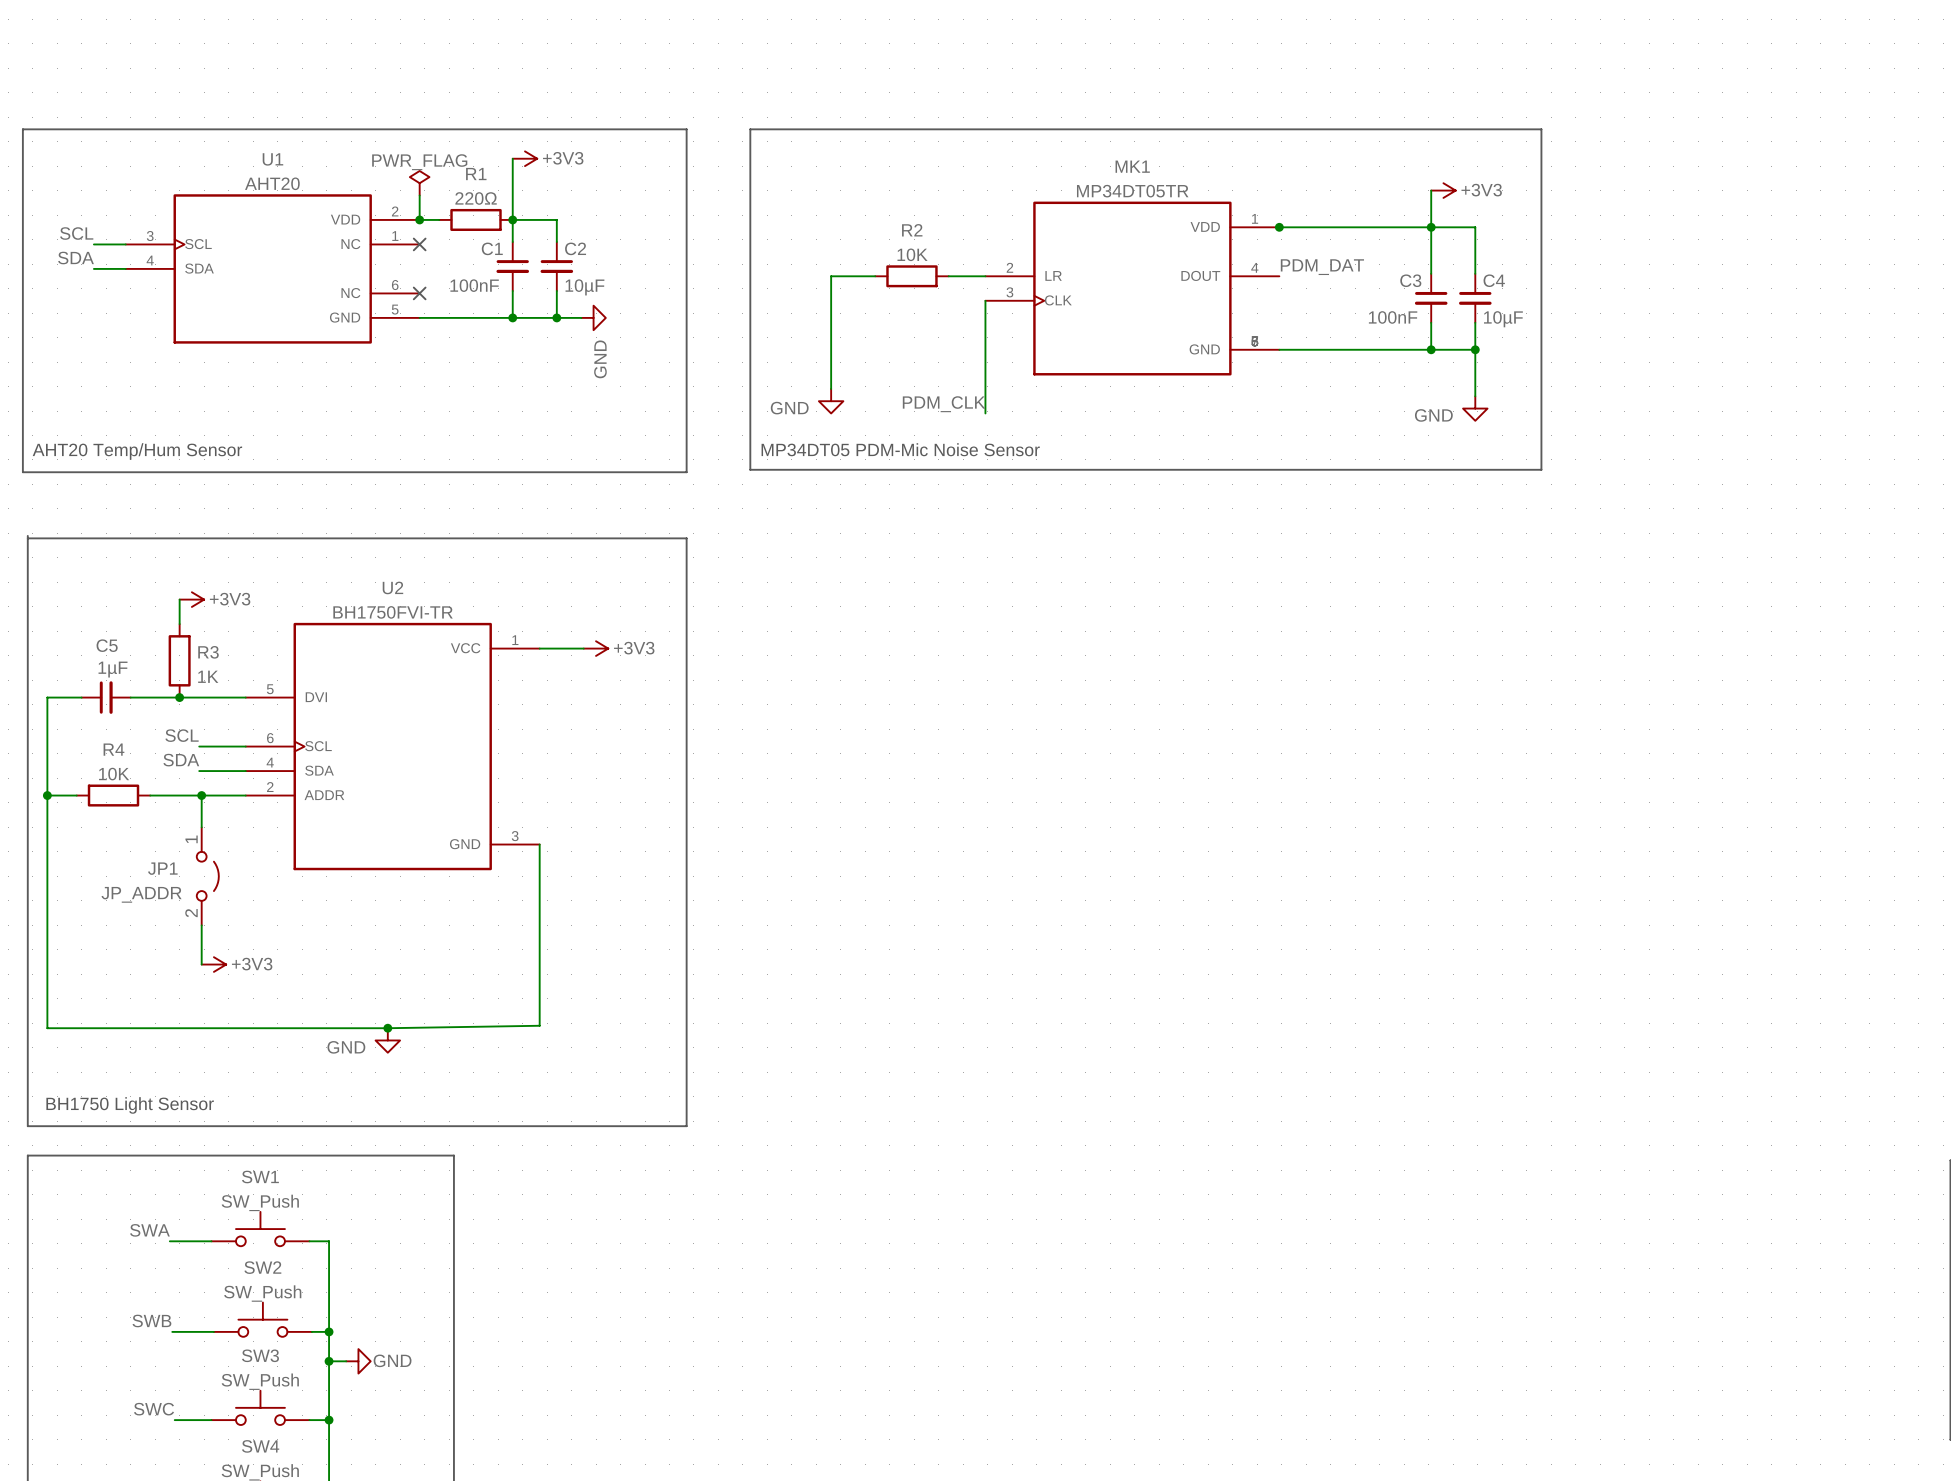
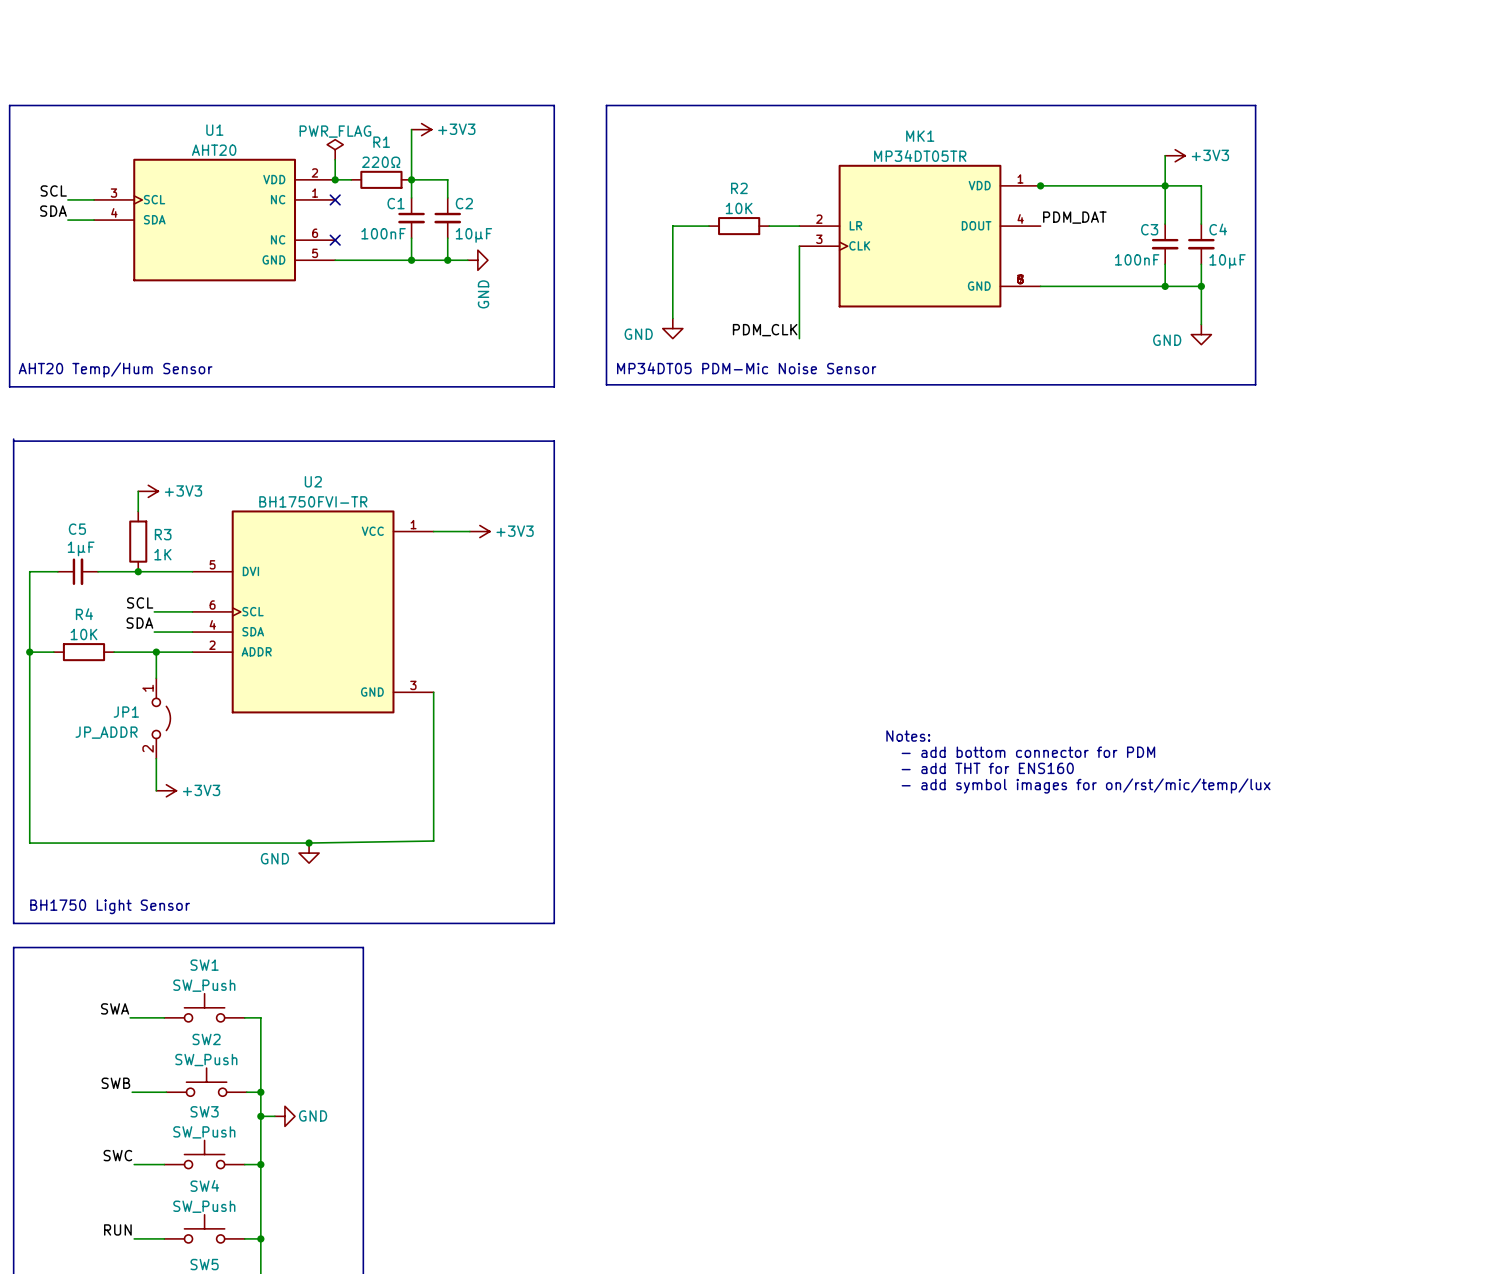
text: none -> Notes: (908, 736)
text: none -> - add bottom connector for PDM (1028, 752)
text: none -> - add THT for ENS160 (987, 768)
text: none -> - add symbol images for on/rst/mic/temp/lux (1086, 786)

